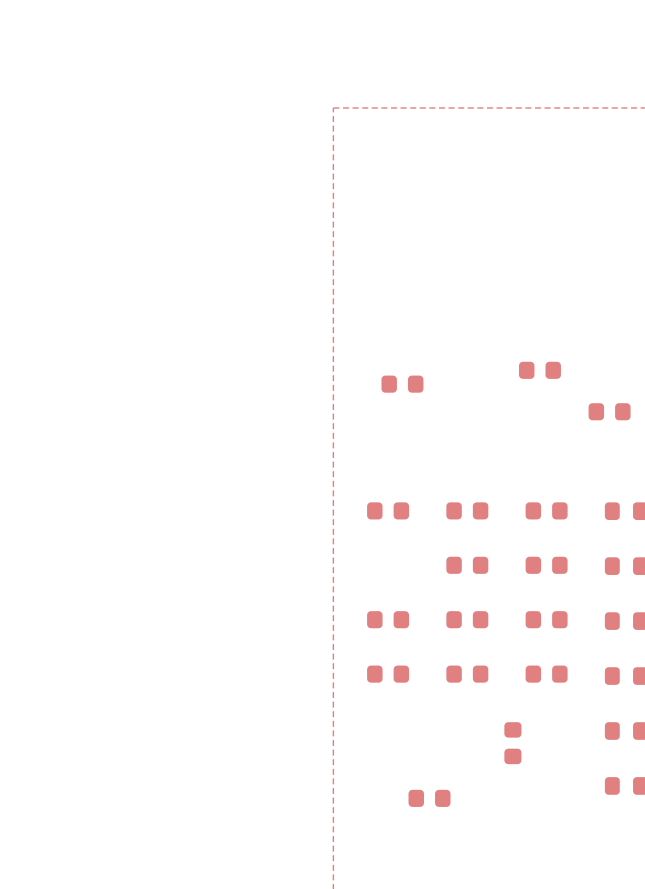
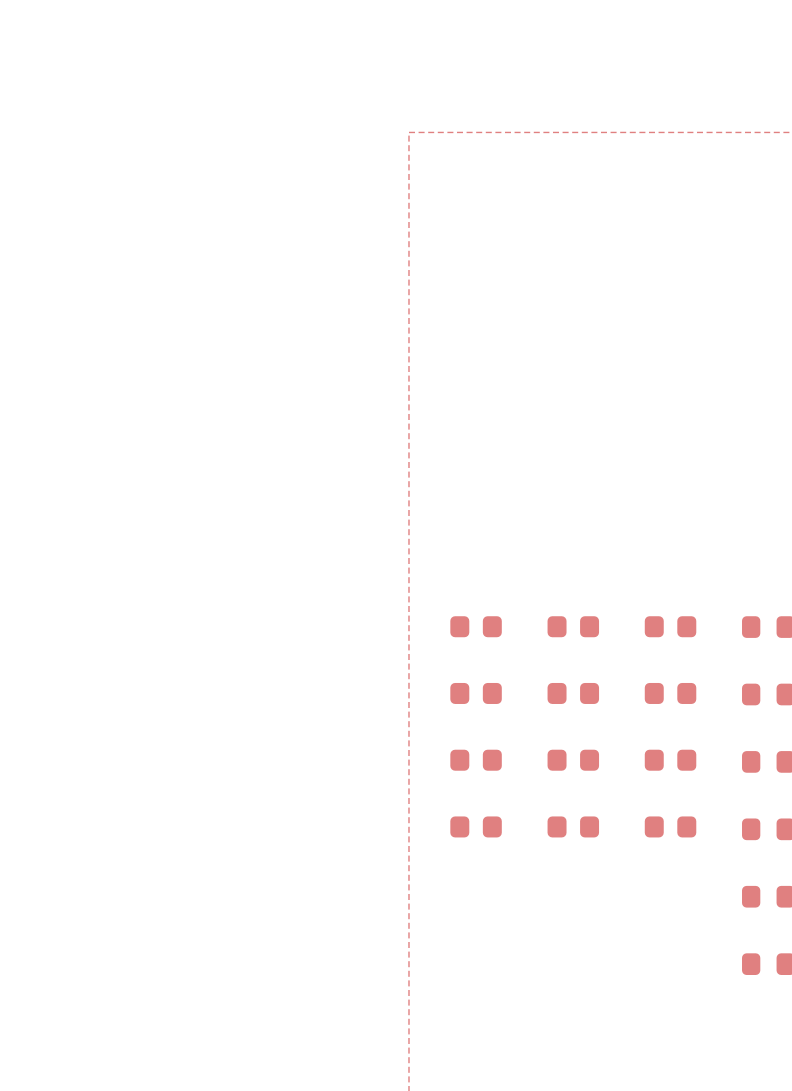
part: (539, 370) -> none
part: (402, 384) -> none
part: (609, 411) -> none
part: none -> (476, 693)
part: (512, 743) -> none
part: (429, 798) -> none

